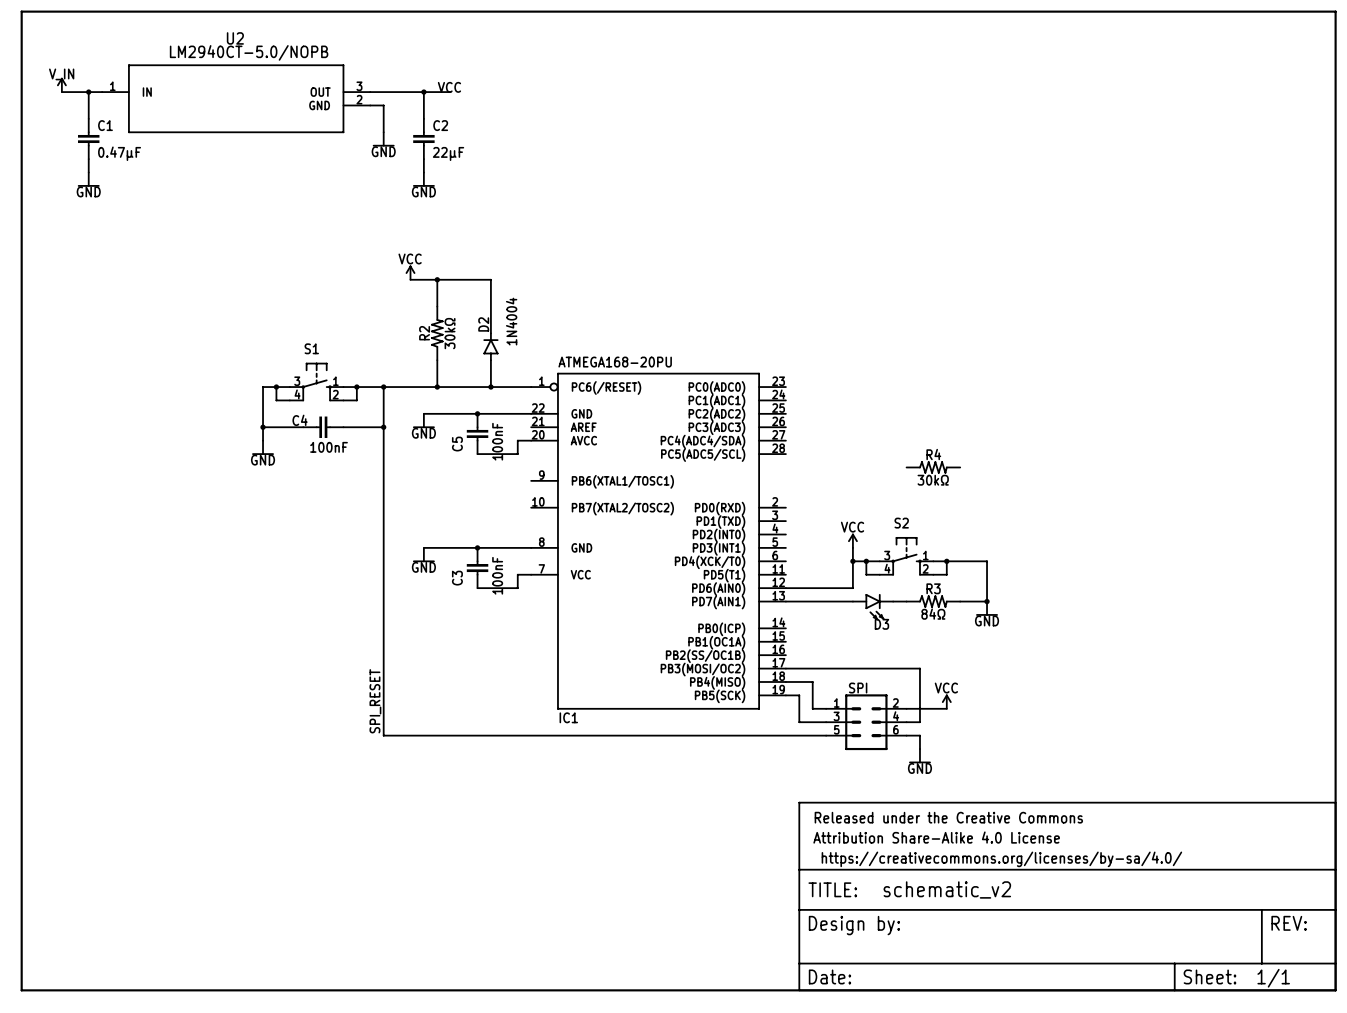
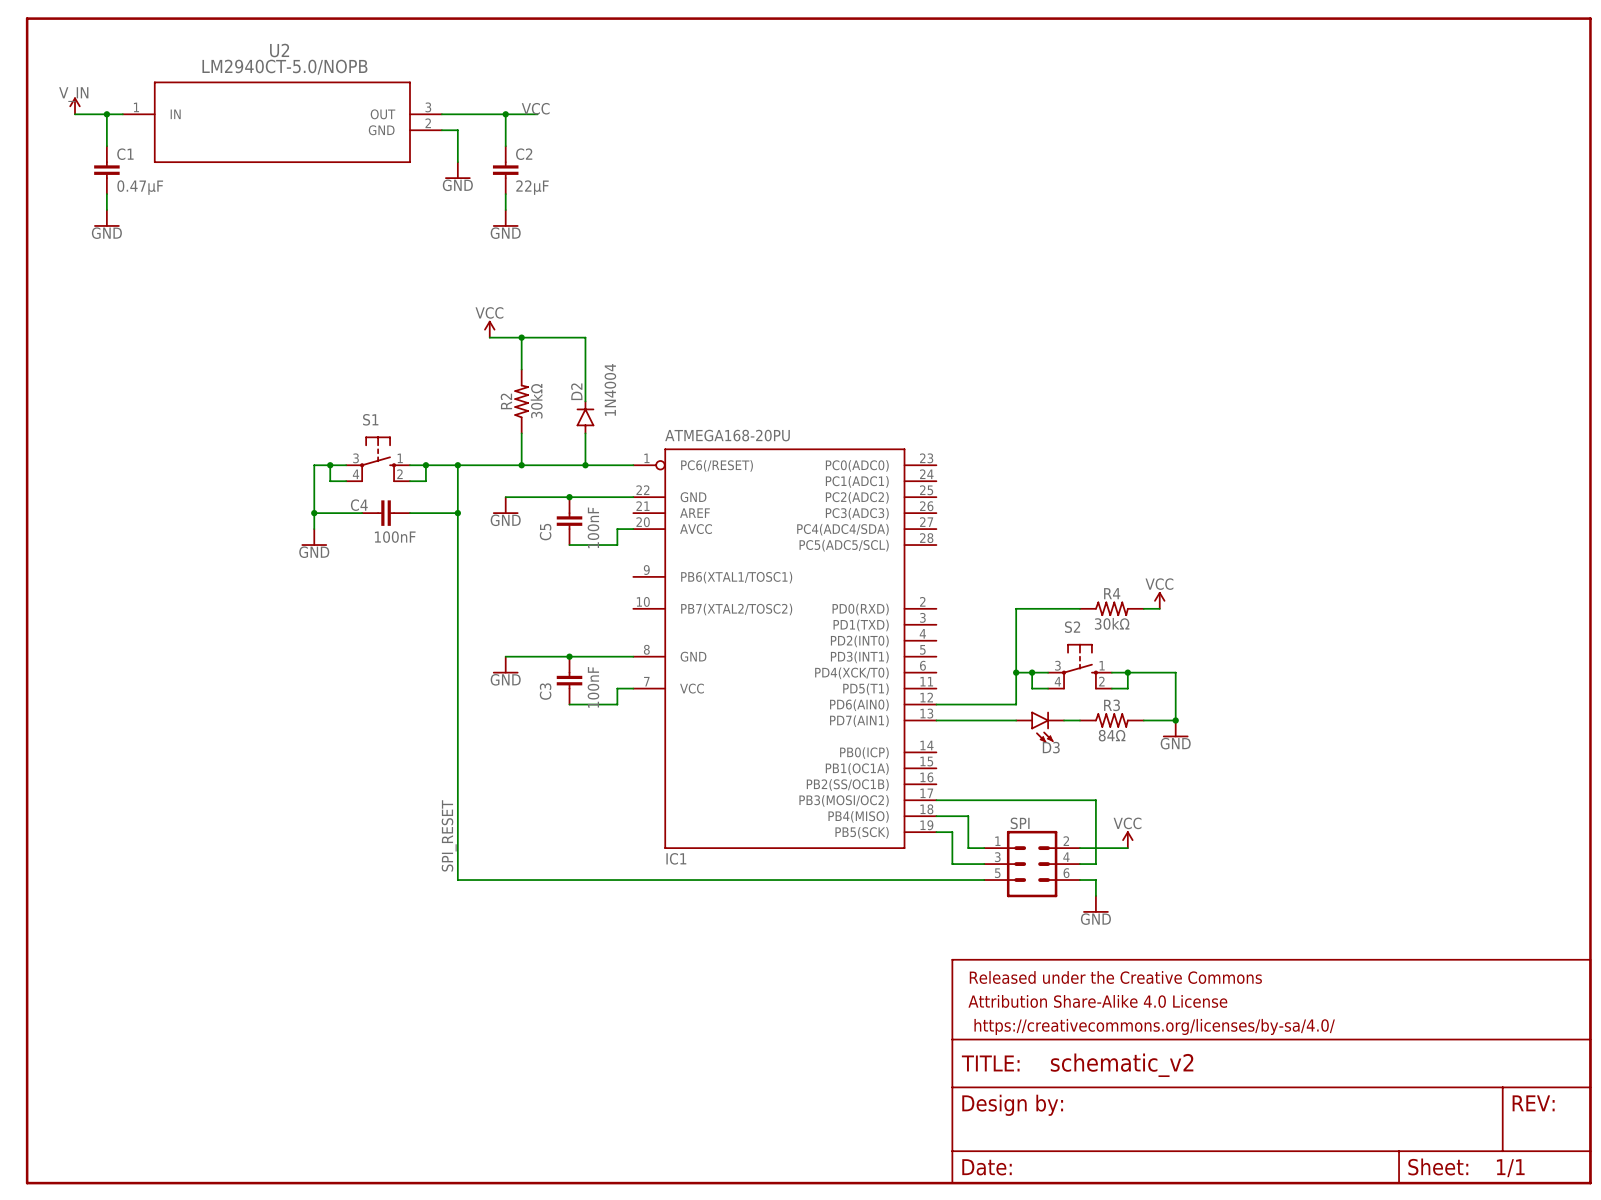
R4 position: (933, 467) -> (1111, 608)
wire: none -> (1079, 608) (1016, 608) (1016, 656)
wire: none -> (1143, 608) (1159, 608)
power symbol position: VCC (852, 540) -> VCC (1159, 600)

